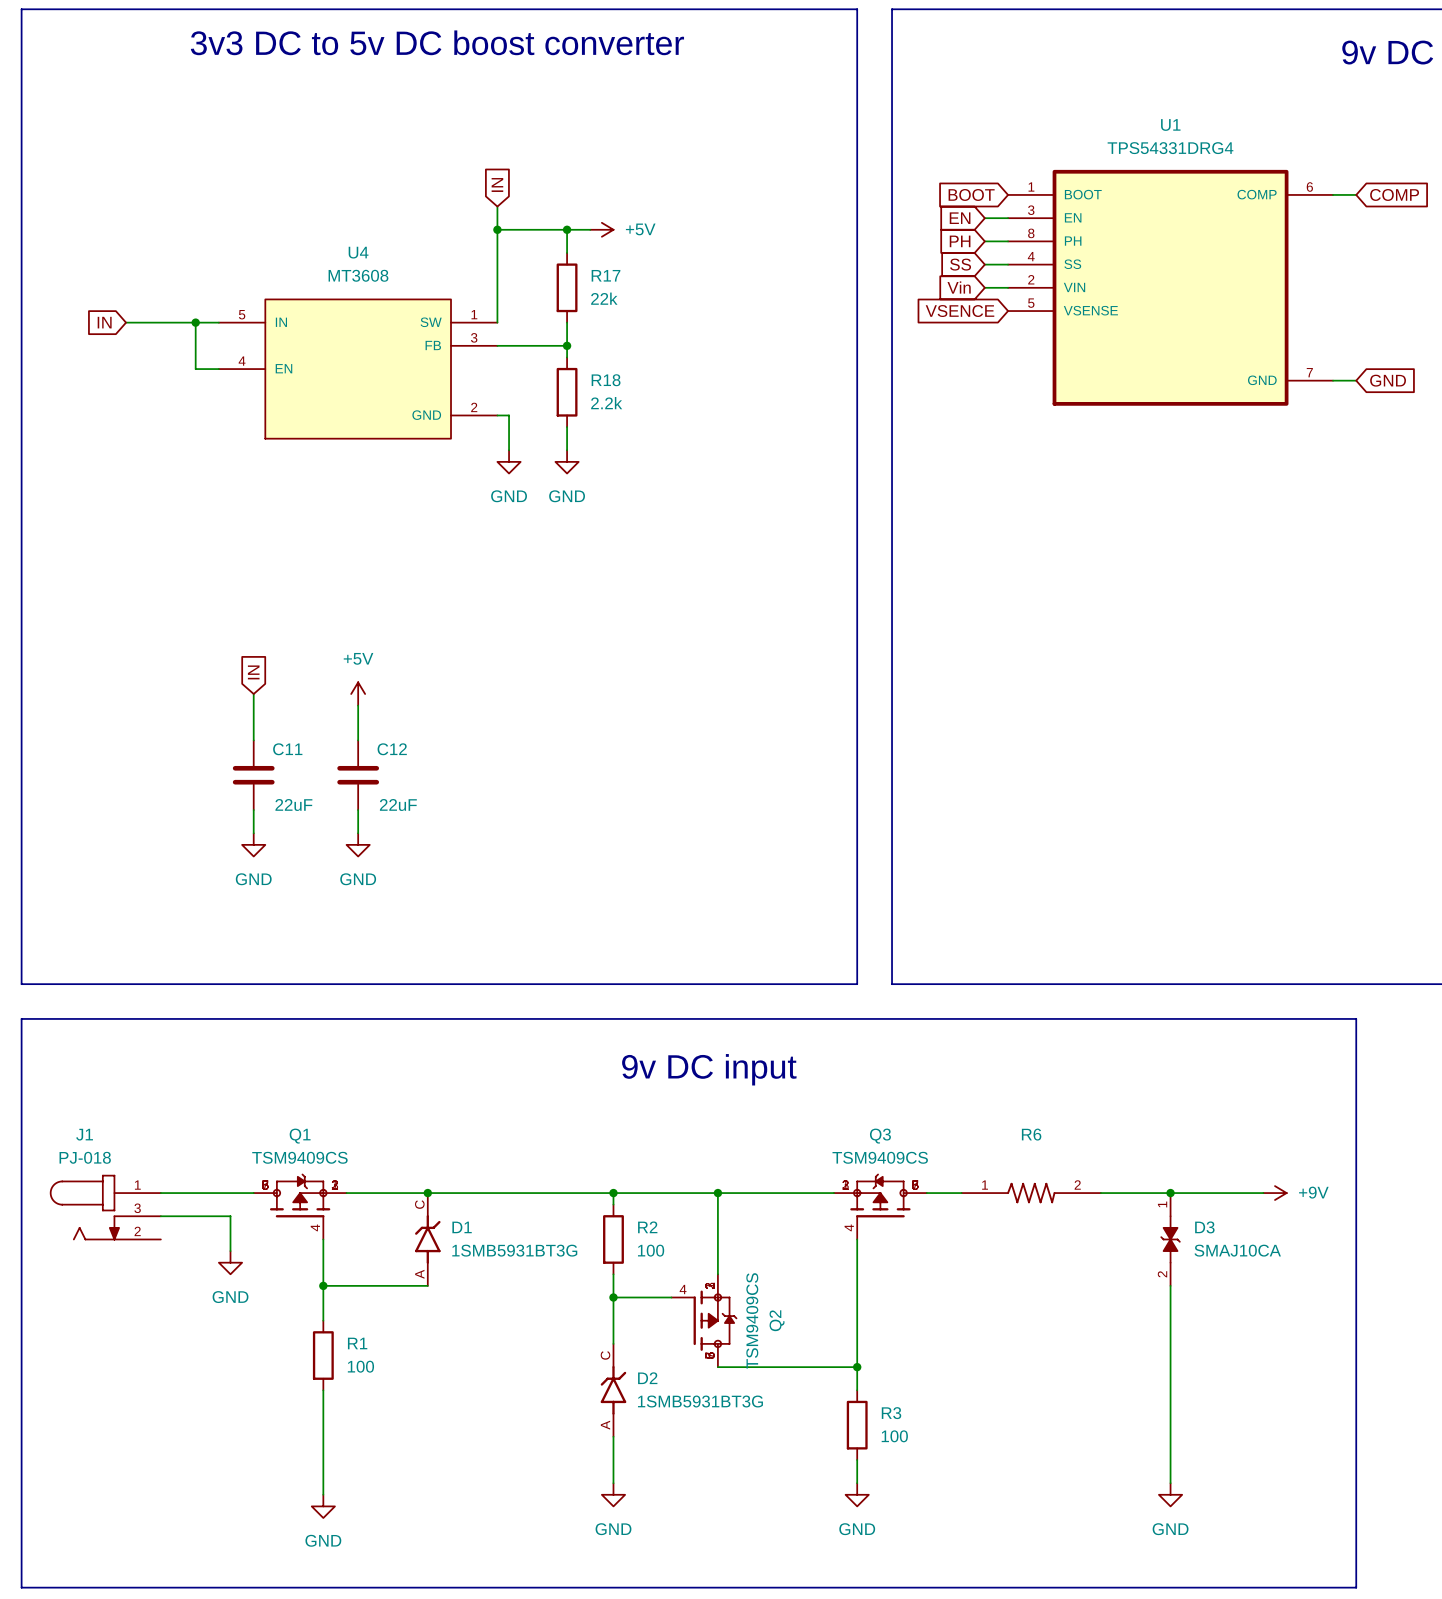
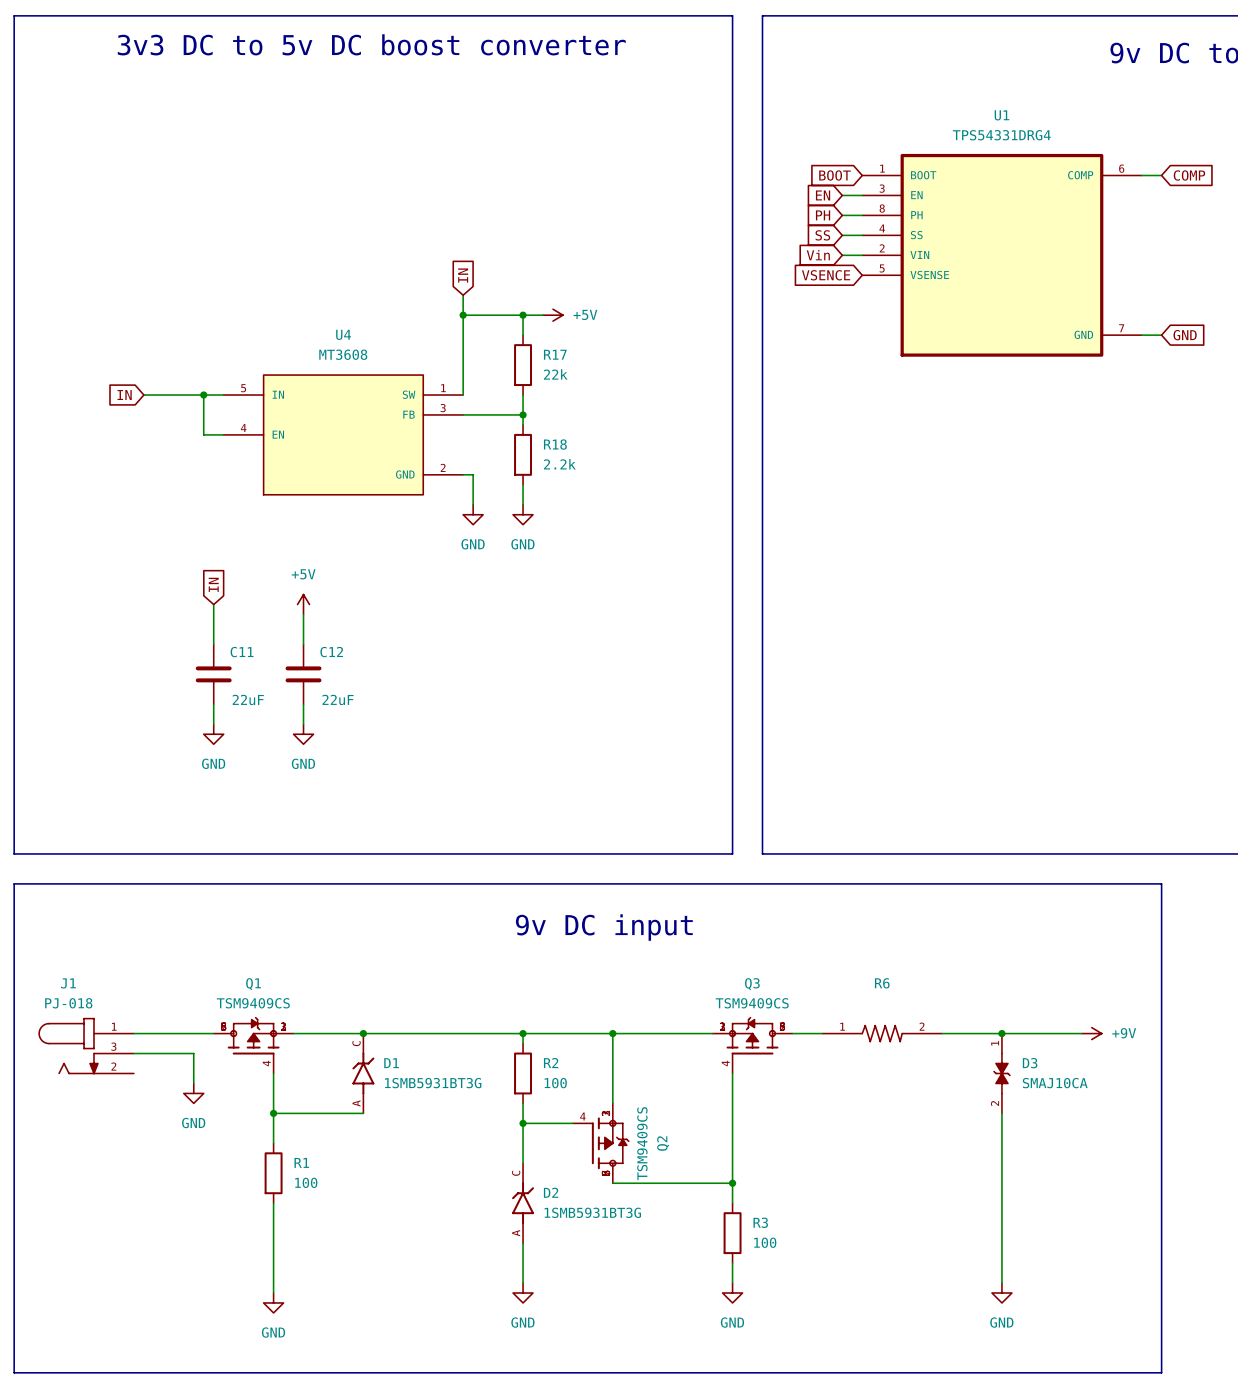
global label position: IN (497, 184) -> IN (463, 275)
wire: (497, 206) (497, 322) -> (463, 295) (463, 395)
wire: (497, 229) (590, 229) -> (463, 315) (542, 315)
junction: (497, 229) -> none
wire: (567, 229) (567, 253) -> (523, 315) (523, 335)
junction: (567, 229) -> none
power symbol position: +5V (601, 229) -> +5V (552, 315)
R17 position: (567, 287) -> (523, 365)
global label position: IN (104, 322) -> IN (124, 395)
wire: (126, 322) (218, 322) -> (143, 395) (223, 395)
wire: (195, 322) (195, 369) (218, 369) -> (203, 395) (203, 434) (223, 434)
junction: (195, 322) -> none
wire: (567, 322) (567, 357) -> (523, 395) (523, 424)
wire: (497, 345) (567, 345) -> (463, 414) (523, 414)
junction: (567, 345) -> none
junction: none -> (463, 315)
junction: none -> (523, 315)
U4 position: (358, 369) -> (343, 434)
R18 position: (567, 392) -> (523, 454)
wire: (497, 415) (509, 415) (509, 450) -> (463, 474) (473, 474) (473, 504)
wire: (567, 427) (567, 450) -> (523, 484) (523, 504)
junction: none -> (203, 395)
power symbol: GND (509, 461) -> none
power symbol: GND (567, 461) -> none
junction: none -> (523, 414)
power symbol: none -> GND (473, 514)
power symbol: none -> GND (523, 514)

